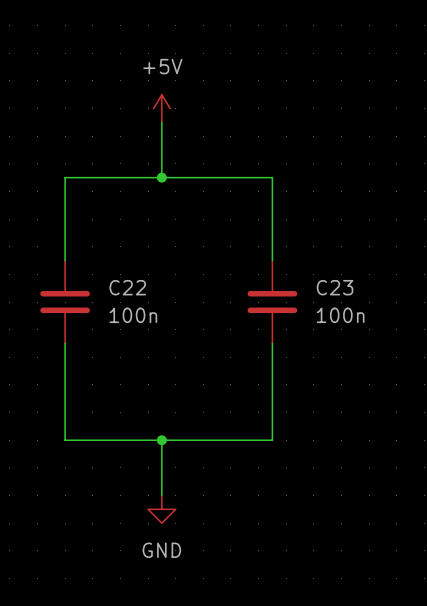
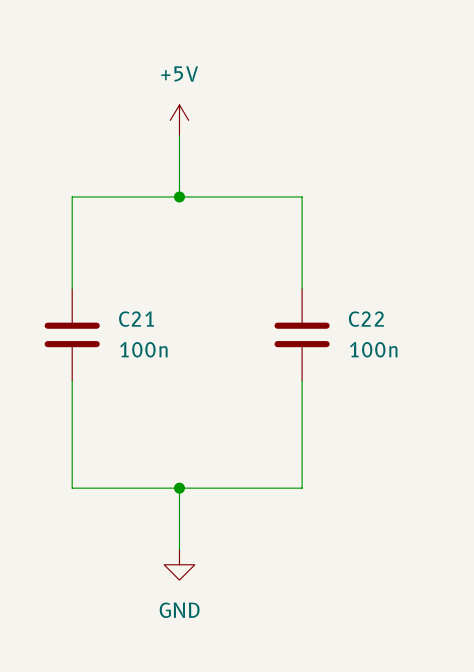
C22 name: C22 (127, 287) -> C21 (136, 319)
C23 name: C23 (335, 287) -> C22 (366, 319)

